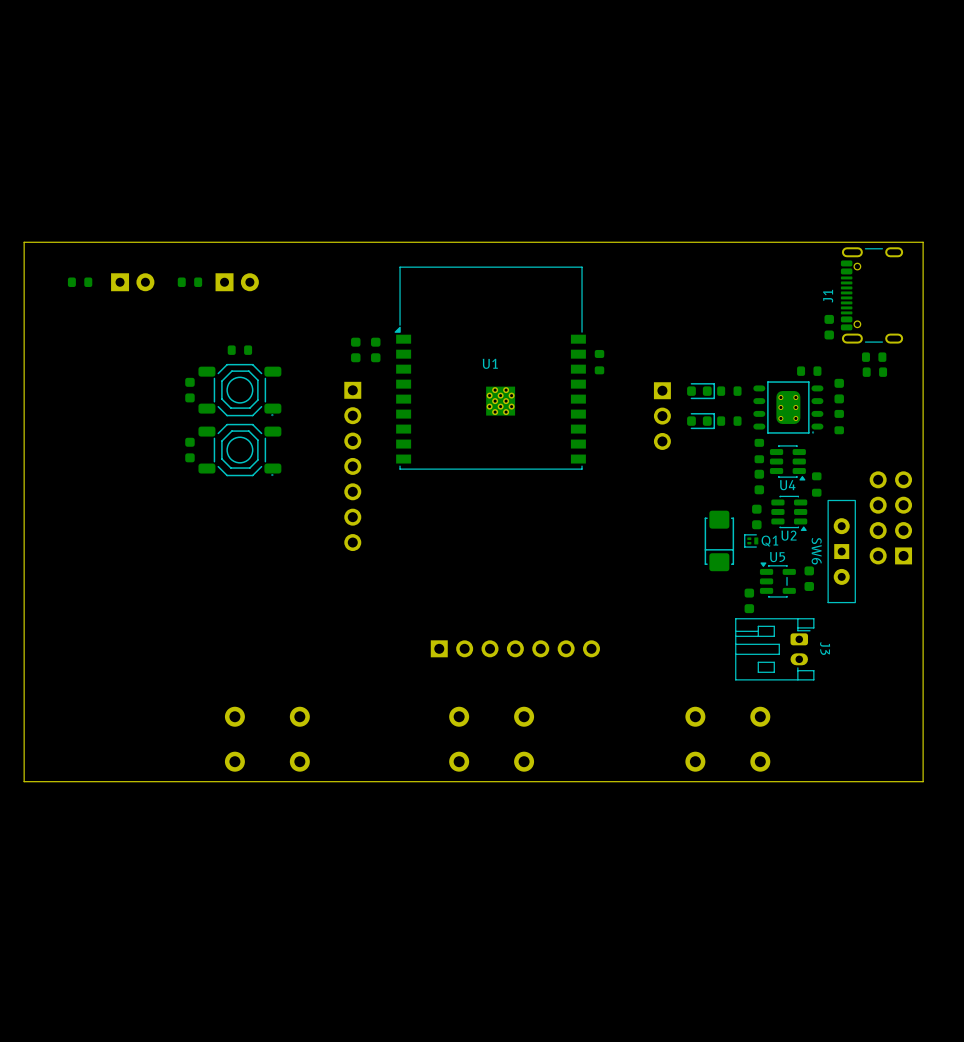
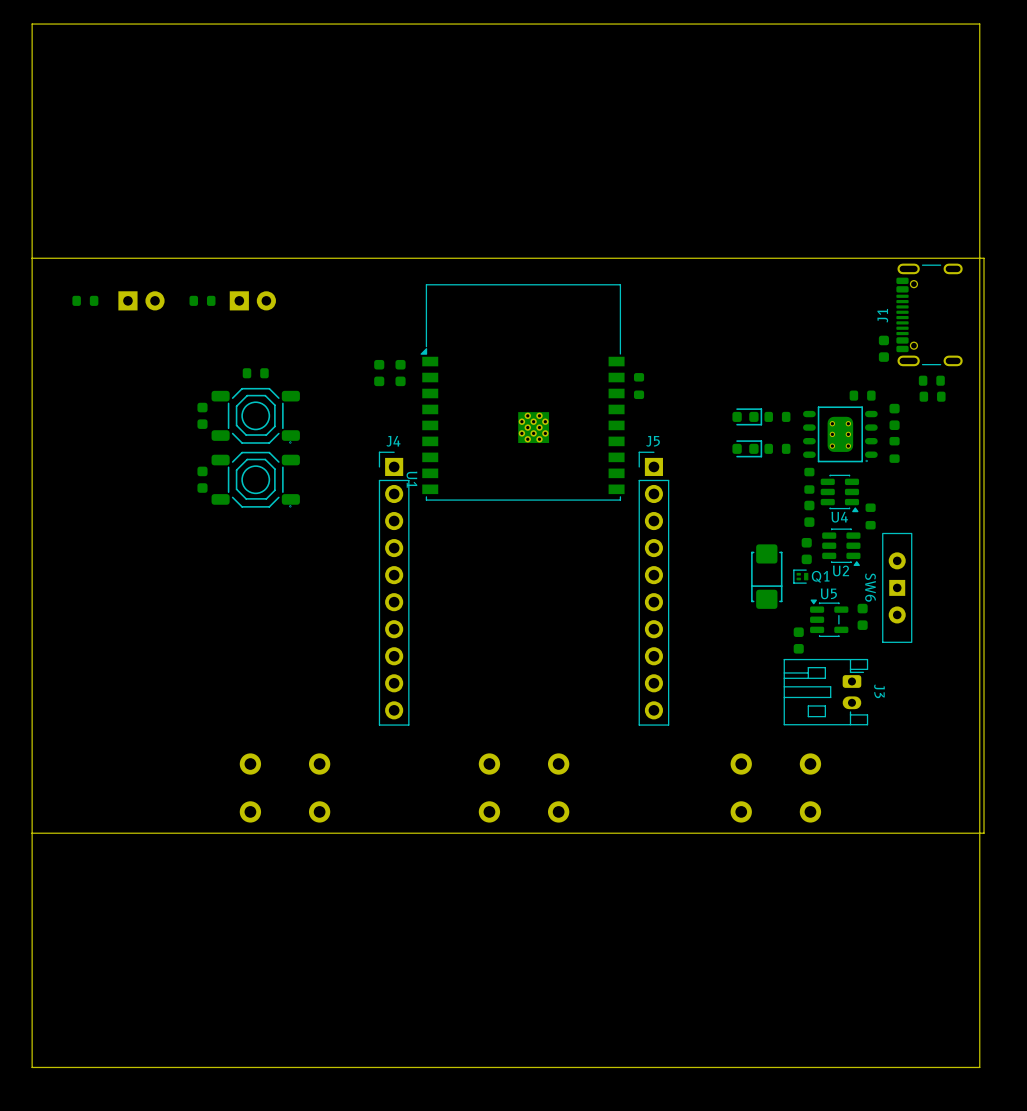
board edge: none -> (979, 24) (32, 24) (32, 1067) (979, 1067) (979, 24)
board edge: (30, 242) (24, 242) (24, 781) (30, 781) -> none
U1 name rotation: 0° (490, 363) -> 90° clockwise (411, 479)
U1 name position: U1 (490, 363) -> U1 (411, 479)
part: (662, 416) -> none
part: (352, 466) -> none
part: (890, 517) -> none
J4: none -> (394, 588)
J5: none -> (653, 588)
part: (515, 648) -> none

